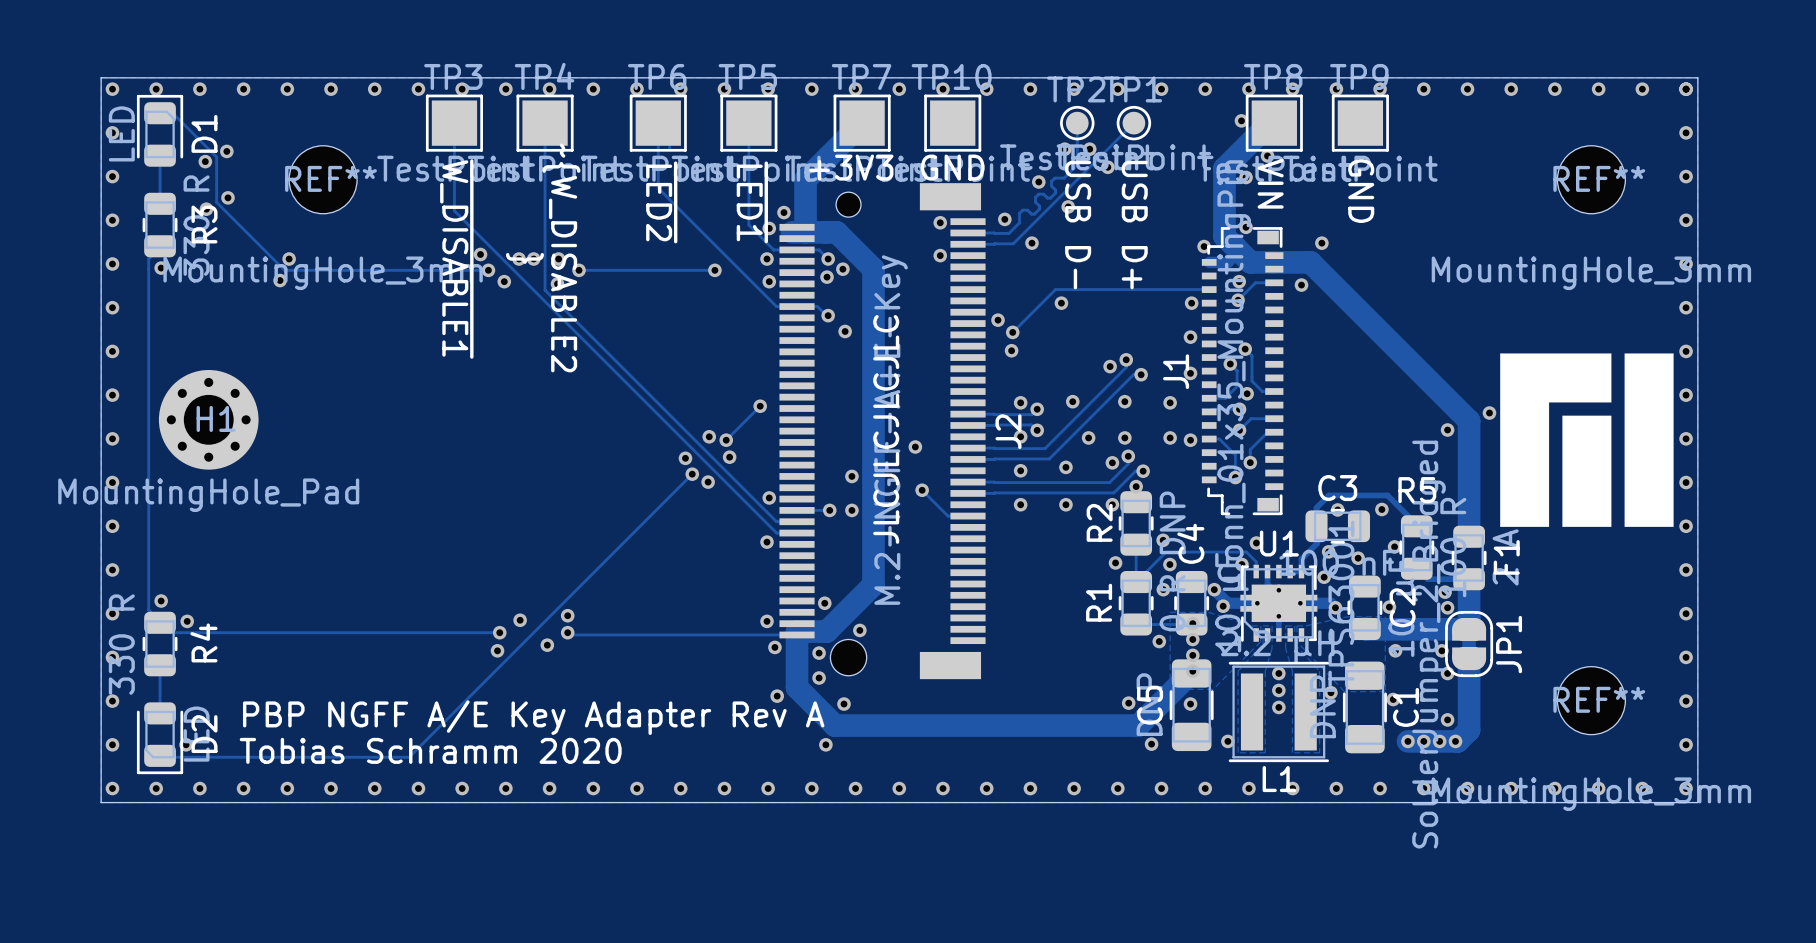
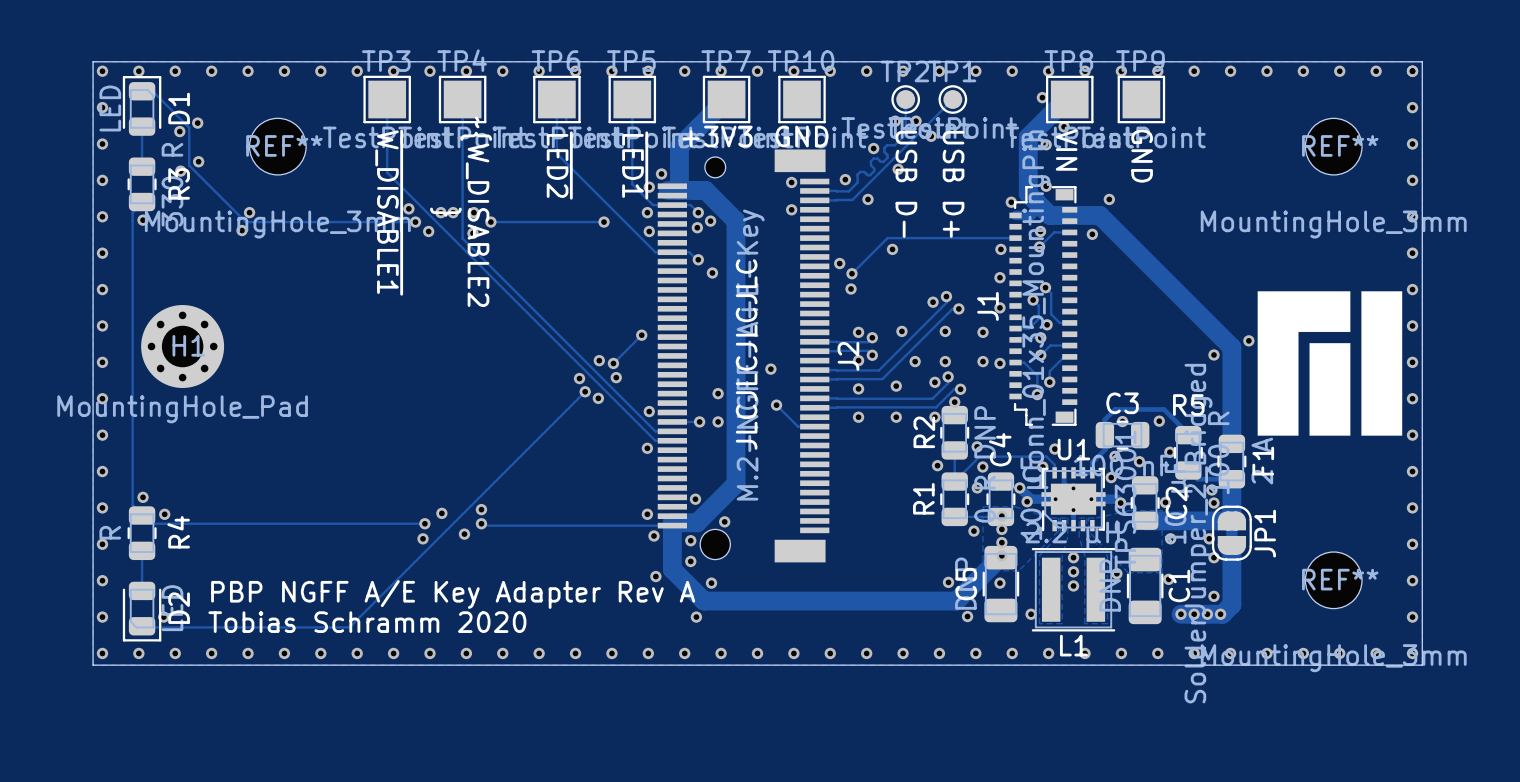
R4 value: 330 R (121, 644) -> R (110, 532)

